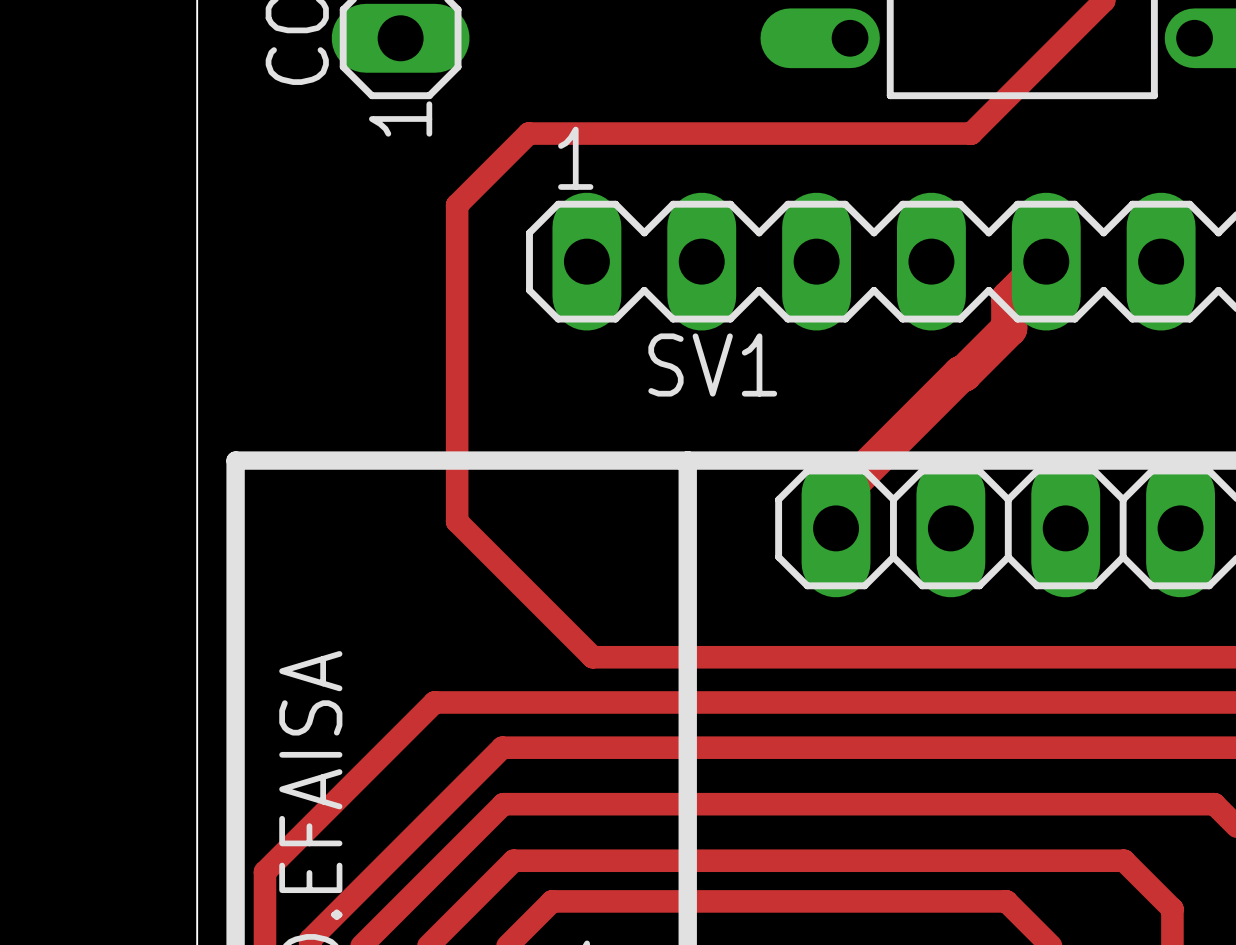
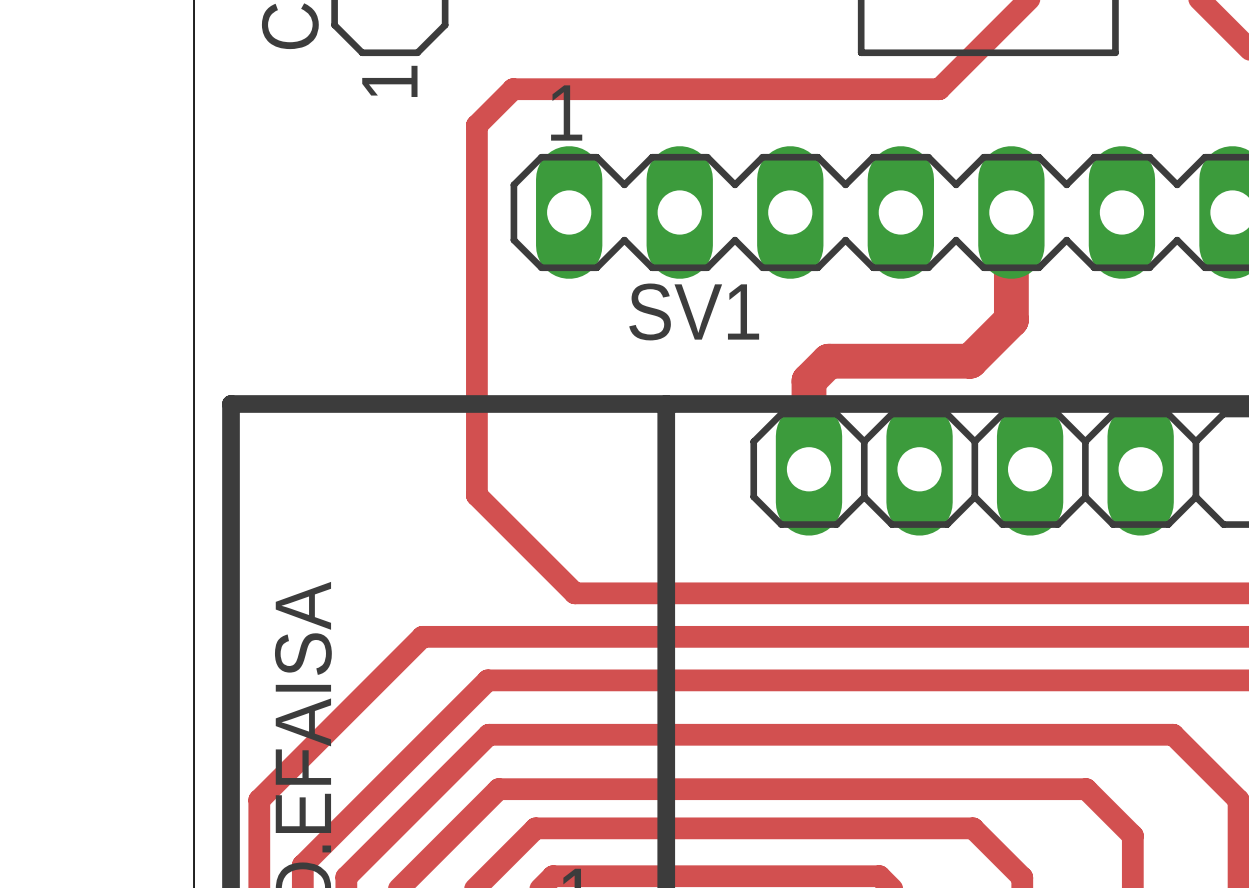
track: (491, 171) (457, 205) (457, 521) (491, 555) -> (476, 125) (476, 495)
track: (1046, 261) (1009, 298) (1009, 328) (836, 498) -> (1011, 212) (1011, 319) (970, 361) (828, 361) (809, 380) (809, 440)

